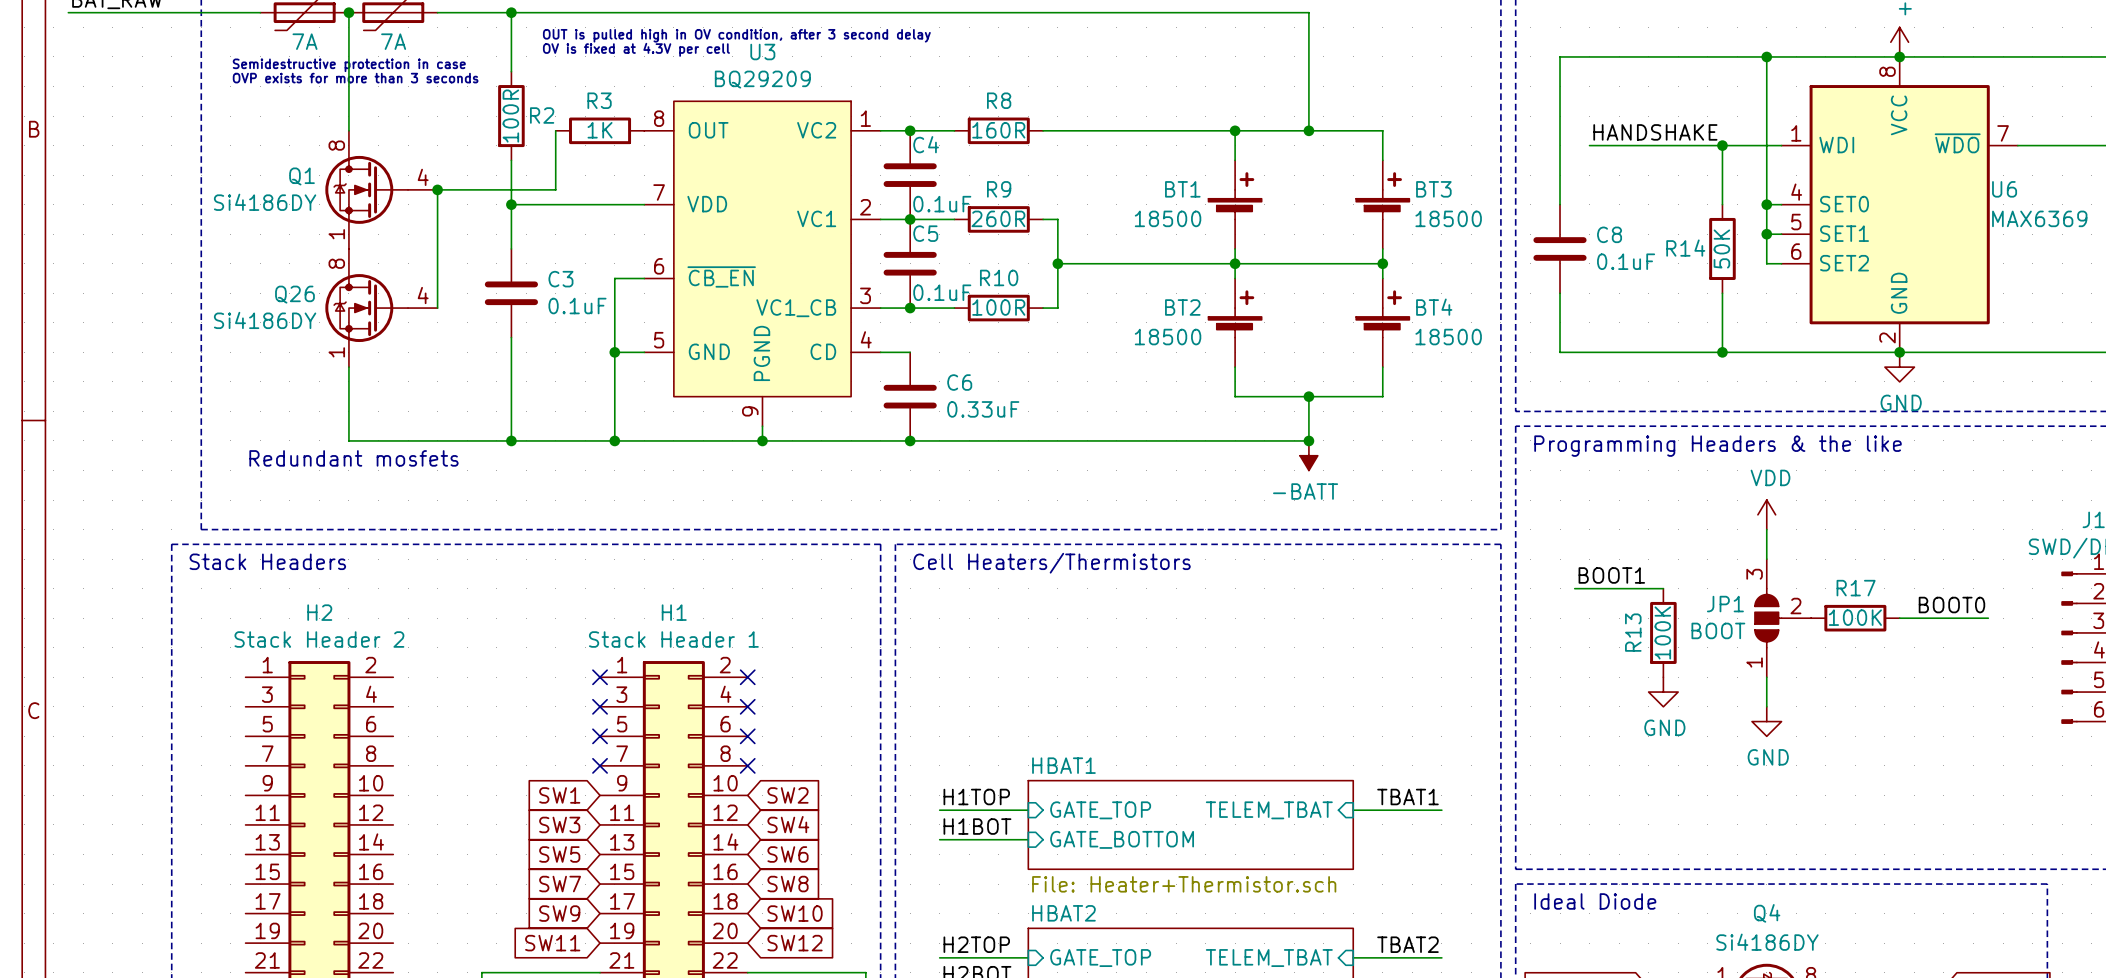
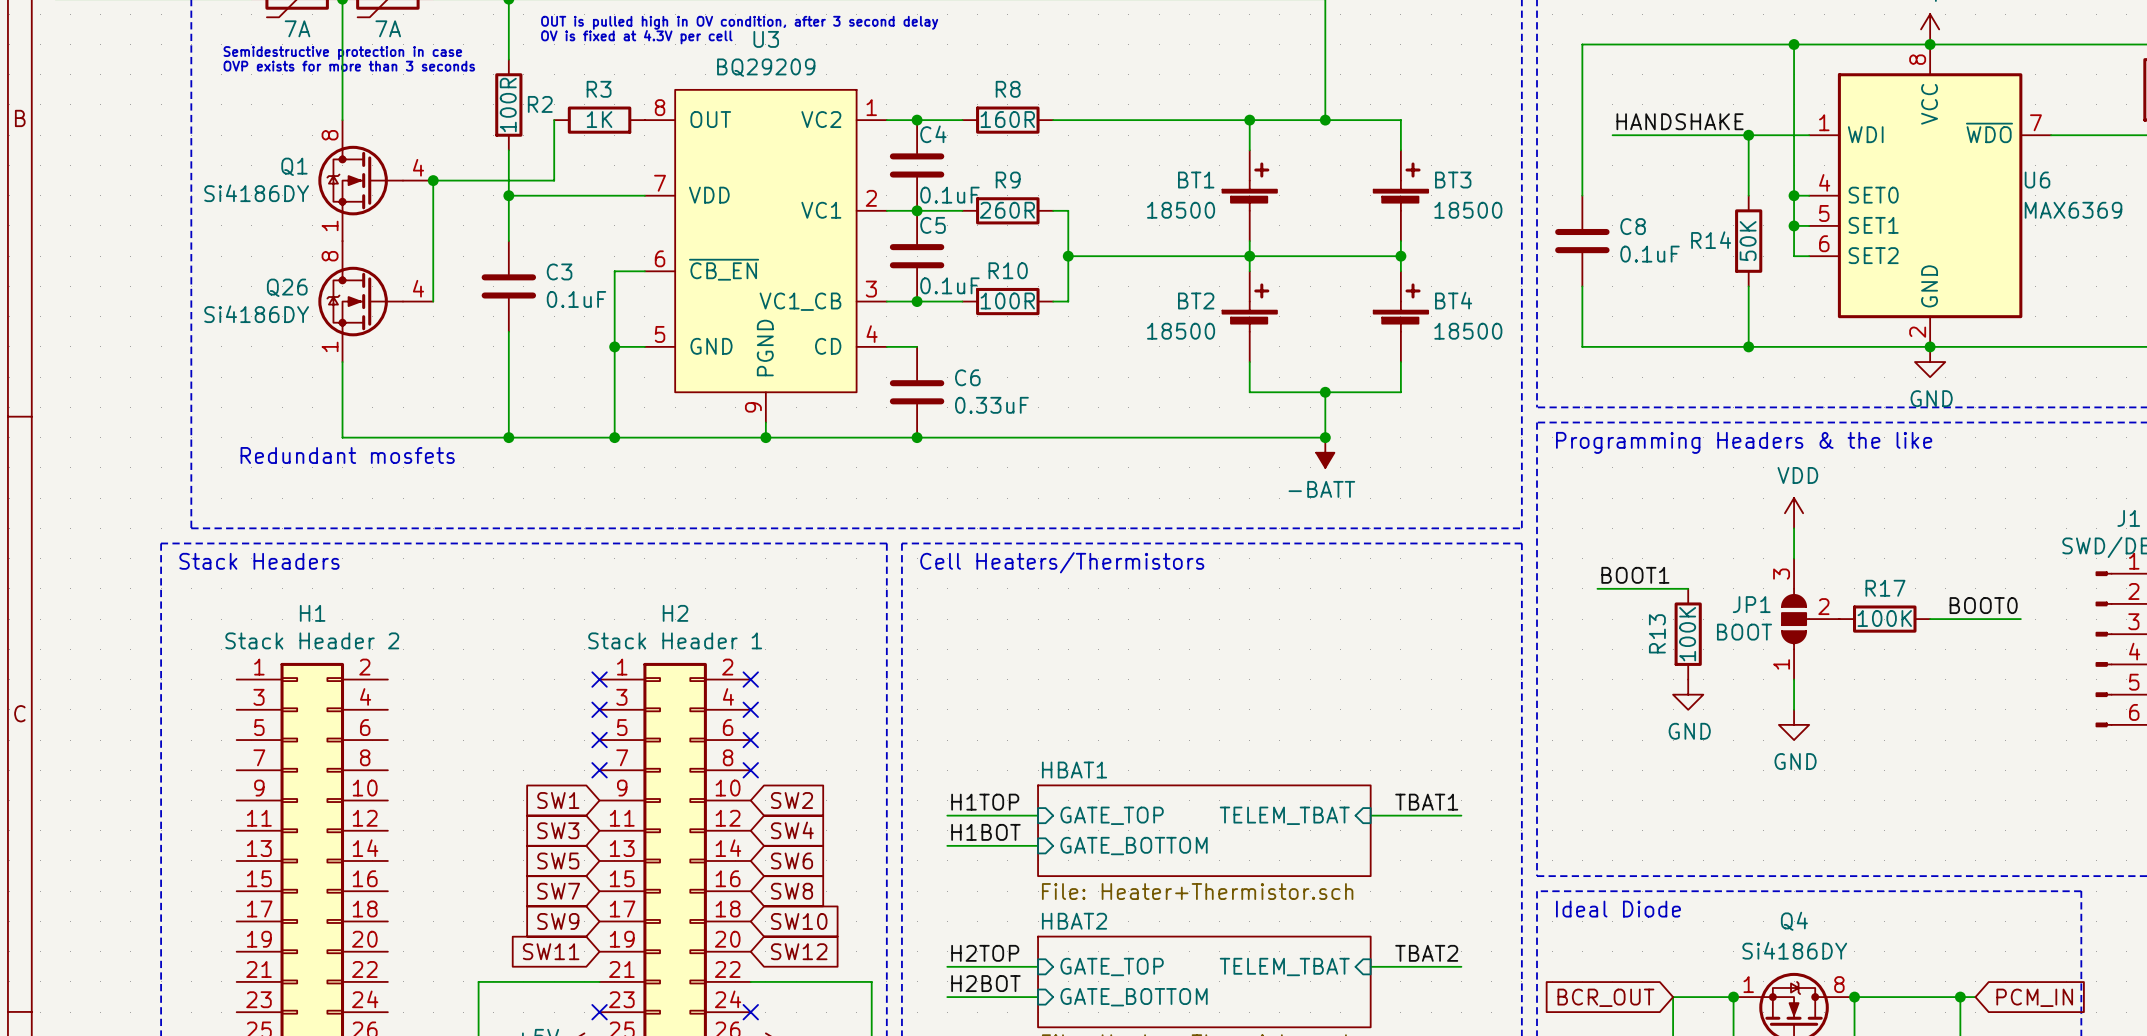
H2 name: H2 (319, 612) -> H1 (312, 613)
H1 name: H1 (674, 612) -> H2 (675, 613)

